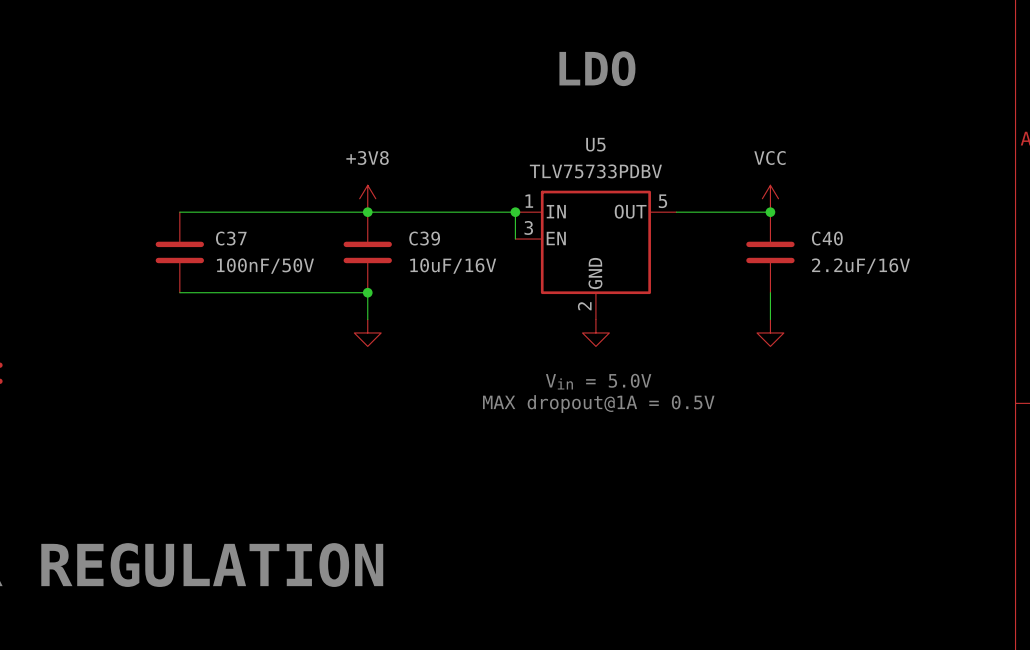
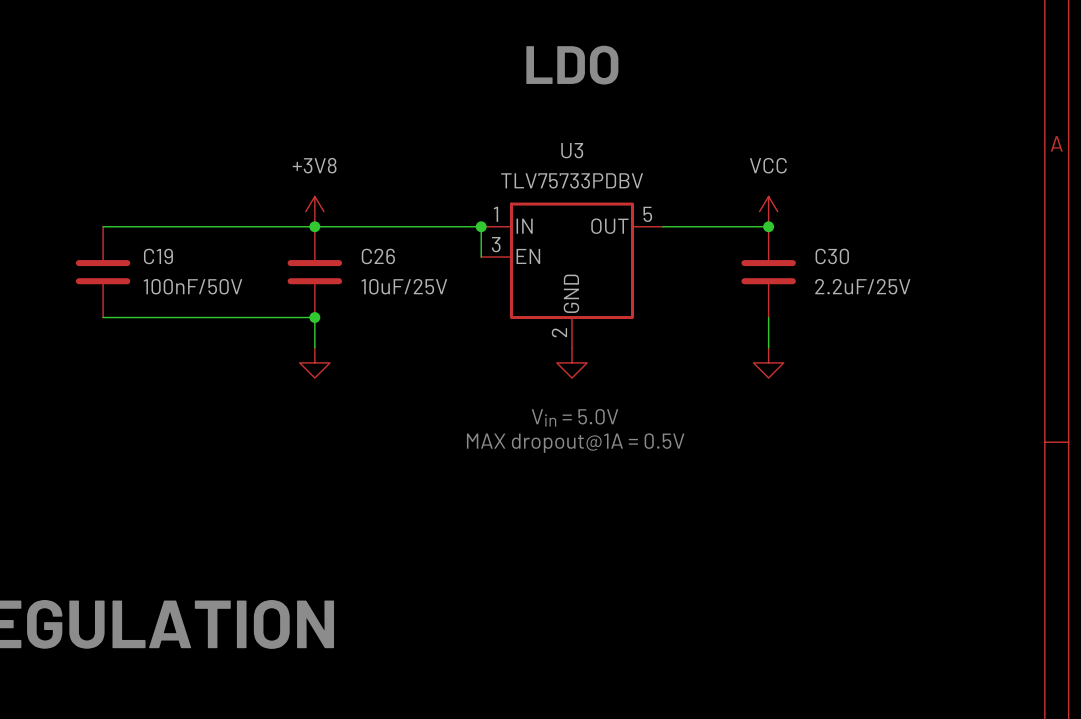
U5 name: U5 (595, 144) -> U3 (572, 150)
C37 name: C37 (231, 238) -> C19 (158, 256)
C39 name: C39 (424, 238) -> C26 (378, 256)
C40 name: C40 (827, 238) -> C30 (832, 256)
C39 value: 10uF/16V (453, 266) -> 10uF/25V (404, 286)
C40 value: 2.2uF/16V (861, 266) -> 2.2uF/25V (862, 286)

